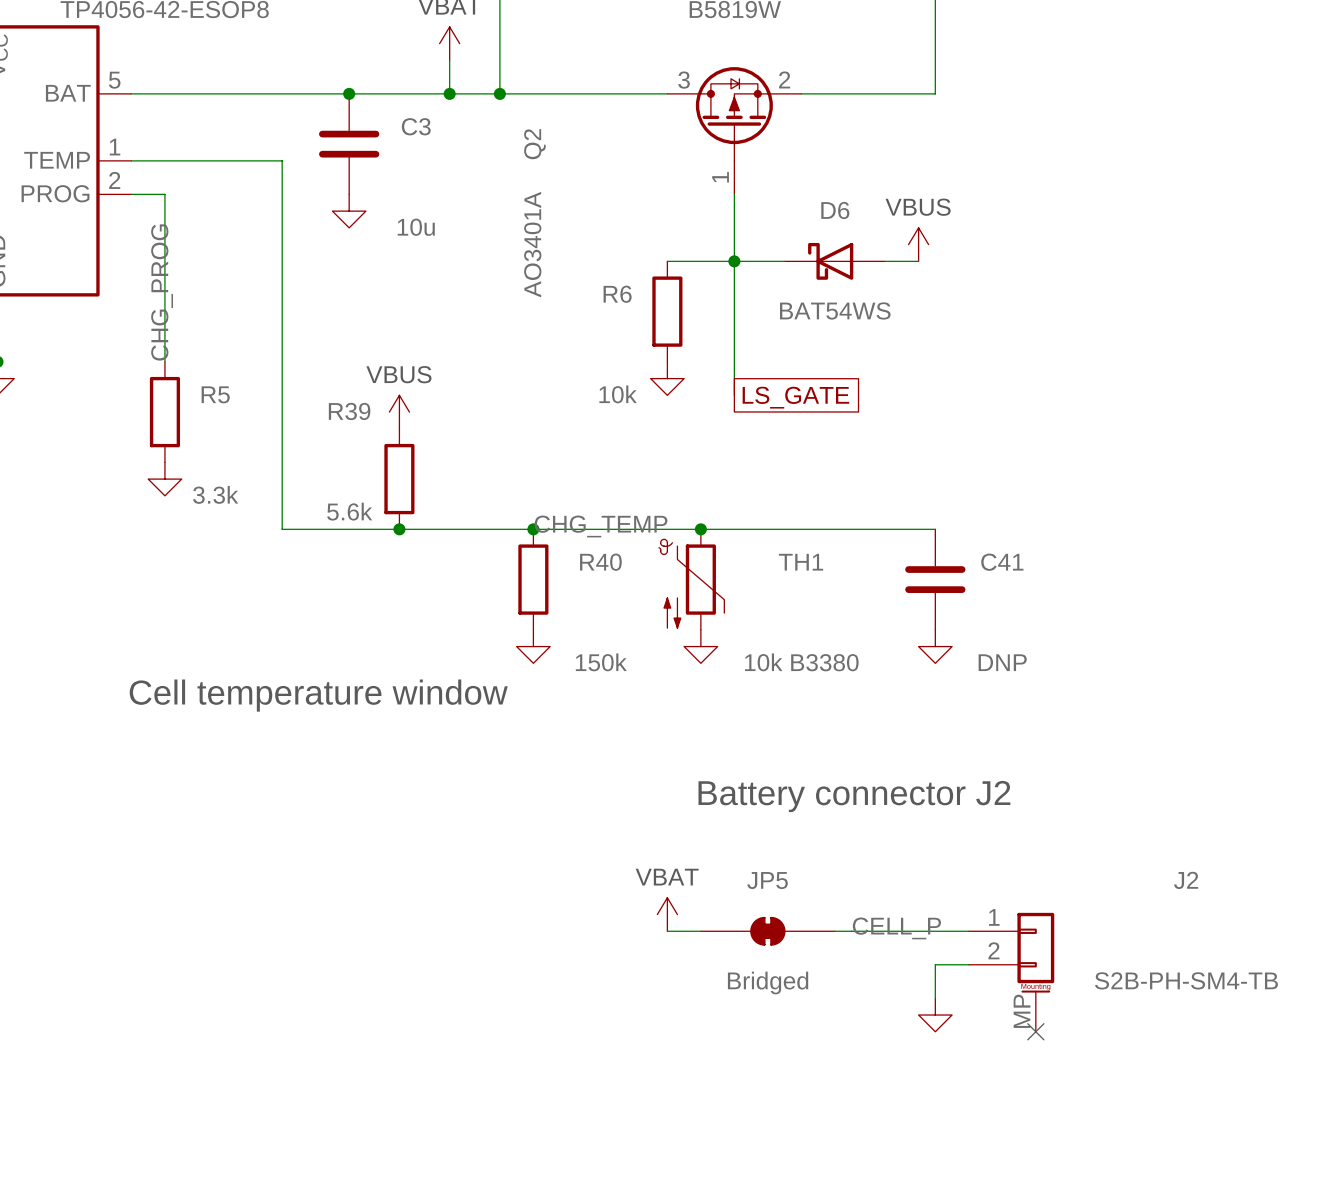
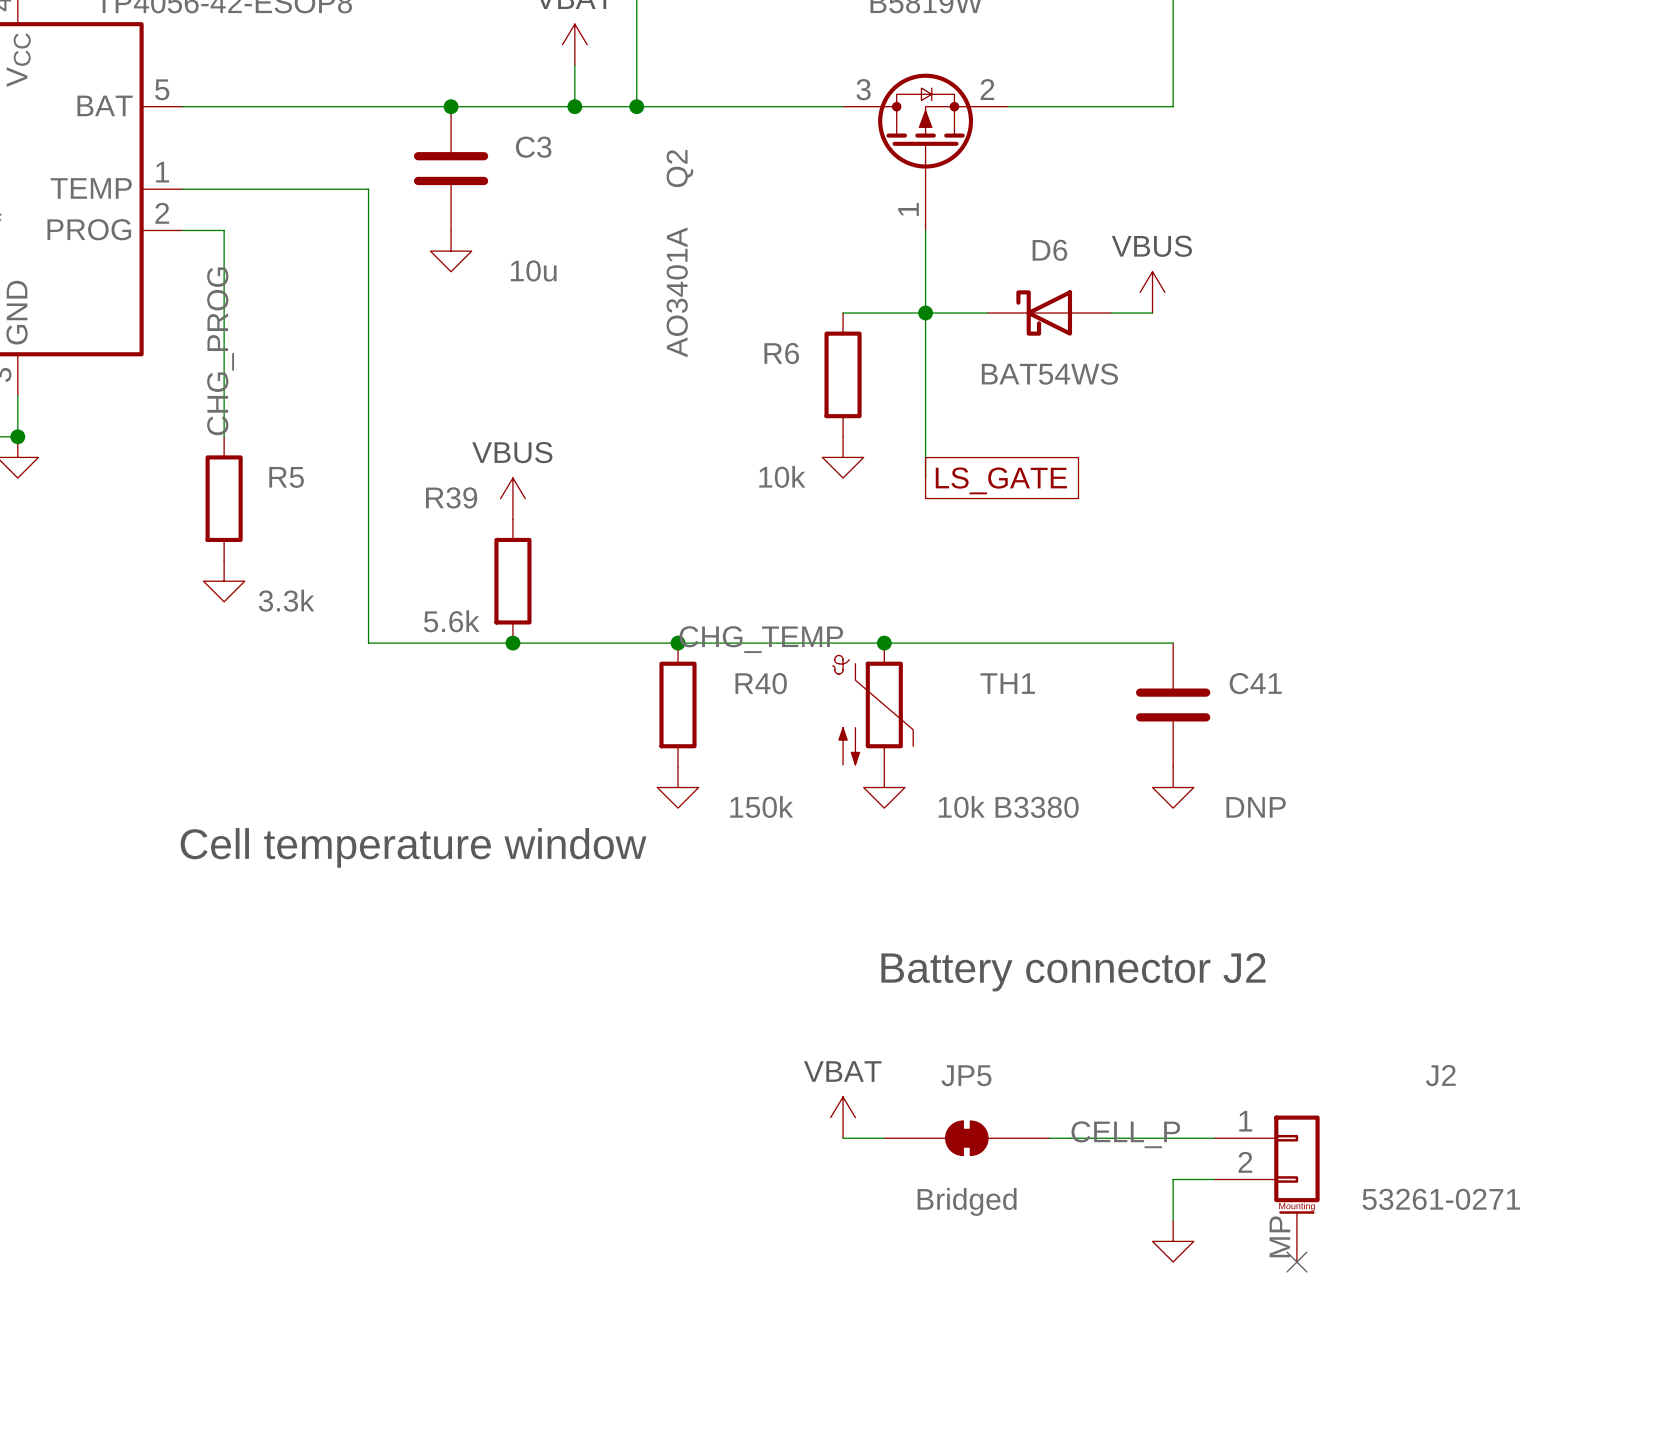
J2 name position: J2 (1186, 880) -> J2 (1440, 1075)
J2 value: S2B-PH-SM4-TB (1186, 980) -> 53261-0271 (1441, 1199)

